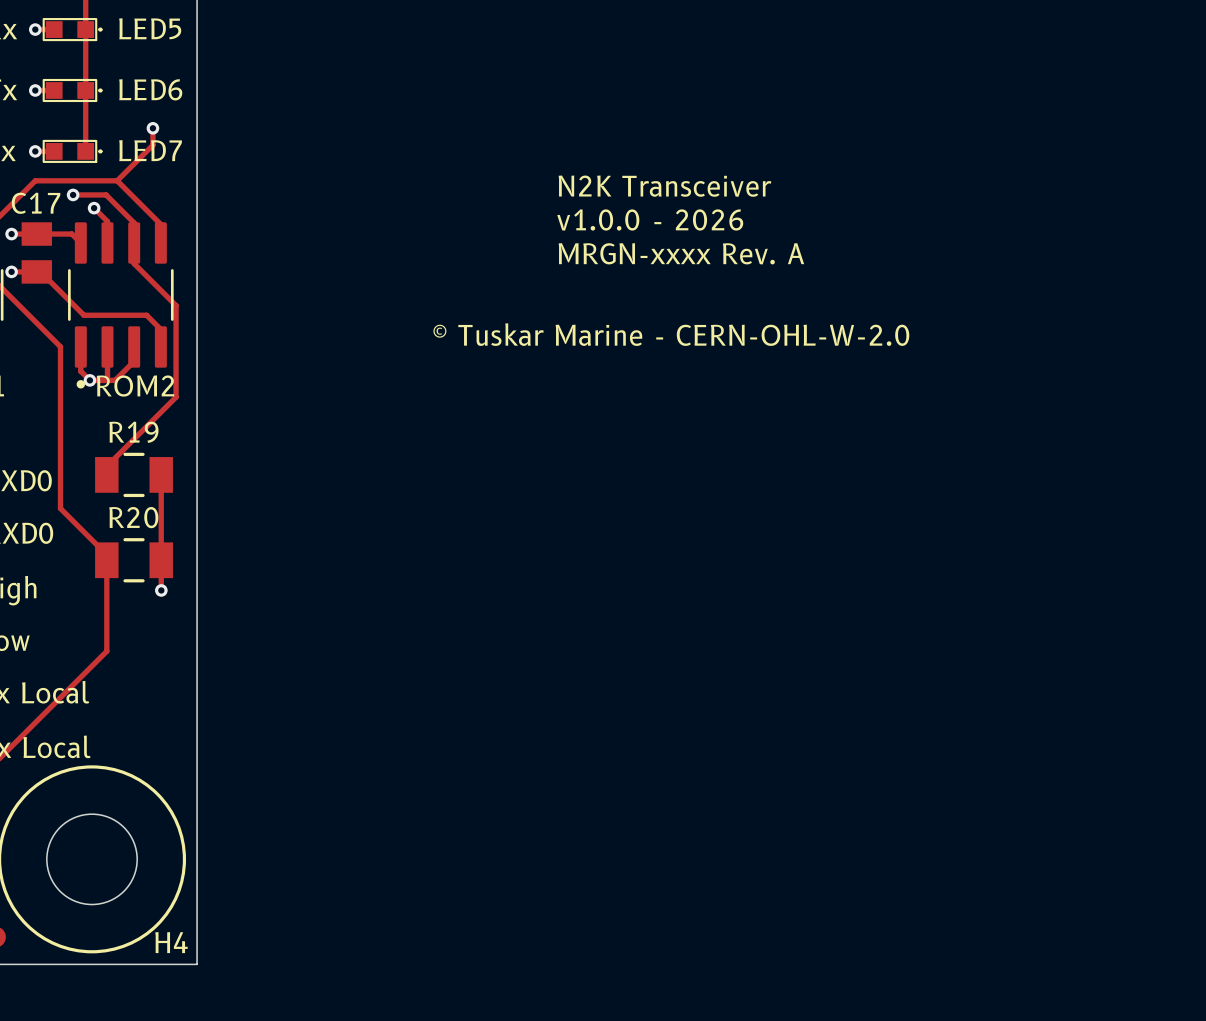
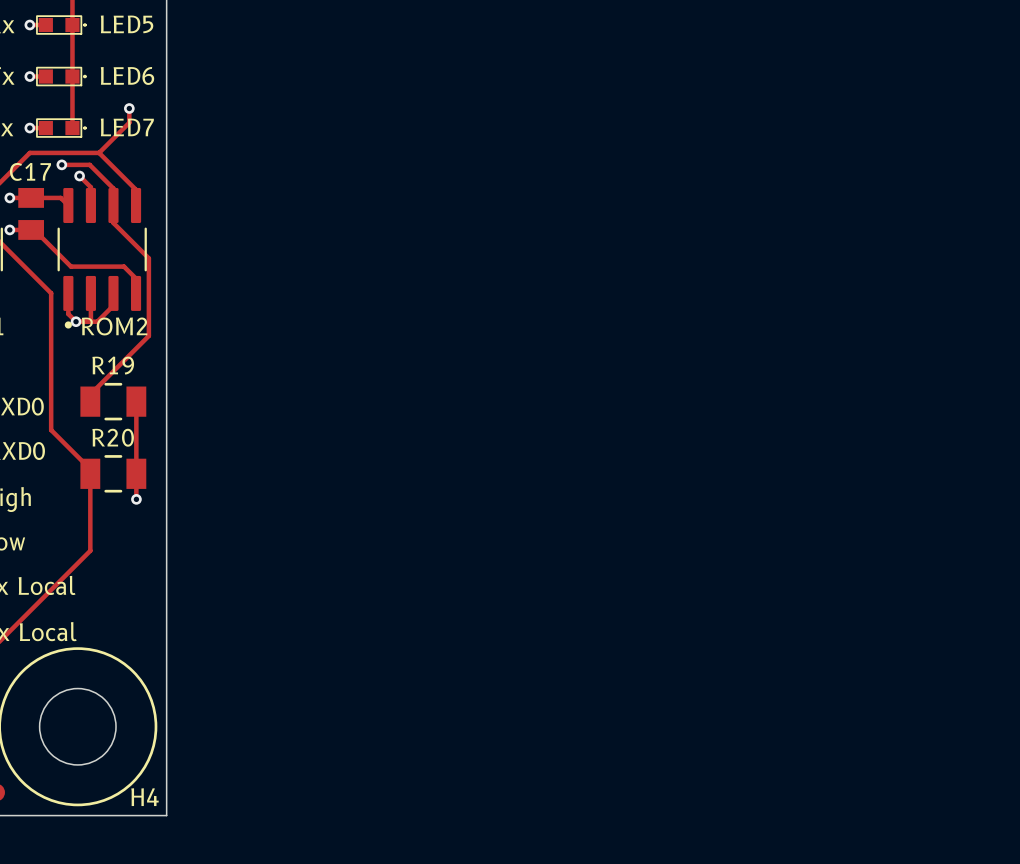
text: N2K Transceiver (664, 186) -> none
text: v1.0.0 - 2026 (650, 219) -> none
text: MRGN-xxxx Rev. A (681, 253) -> none
text: © Tuskar Marine - CERN-OHL-W-2.0 (671, 334) -> none

